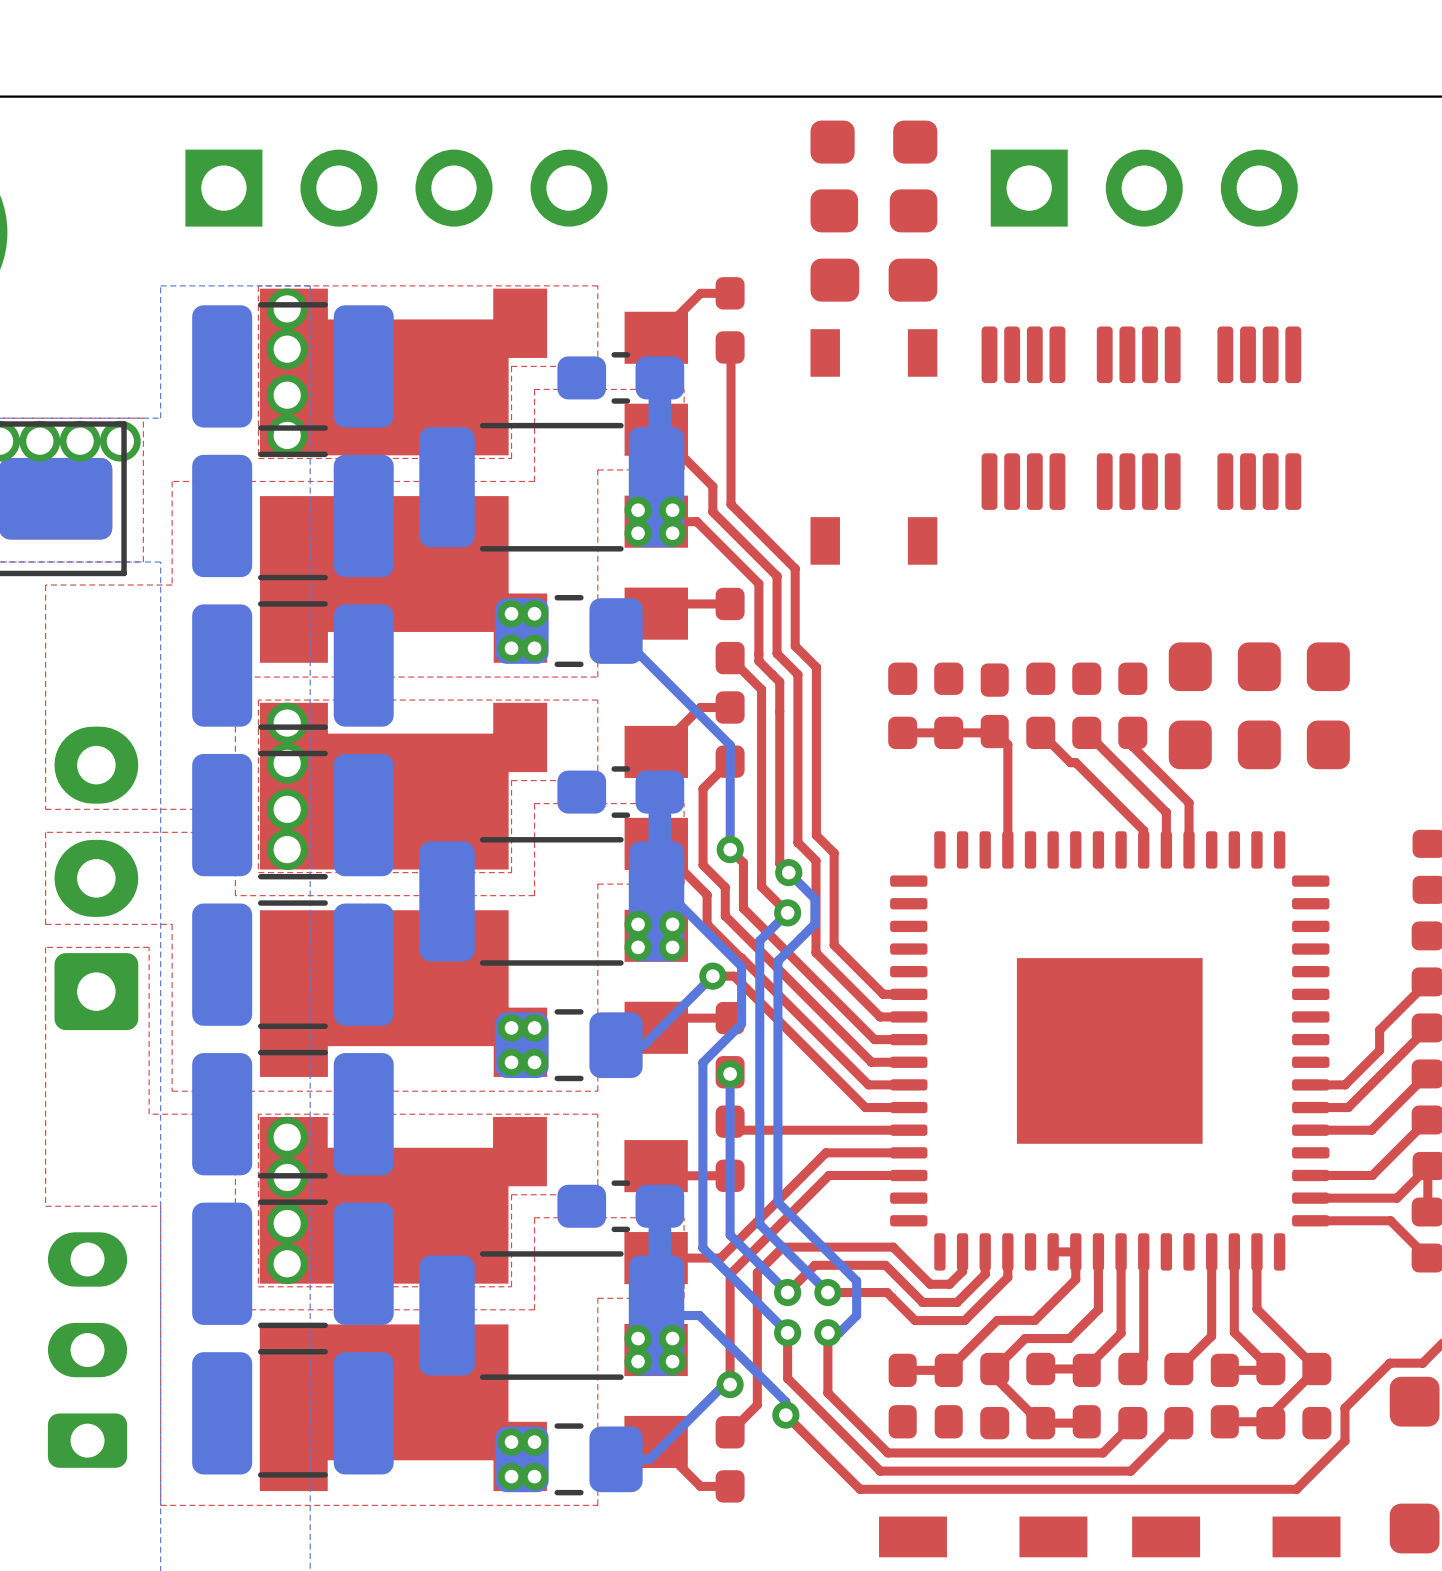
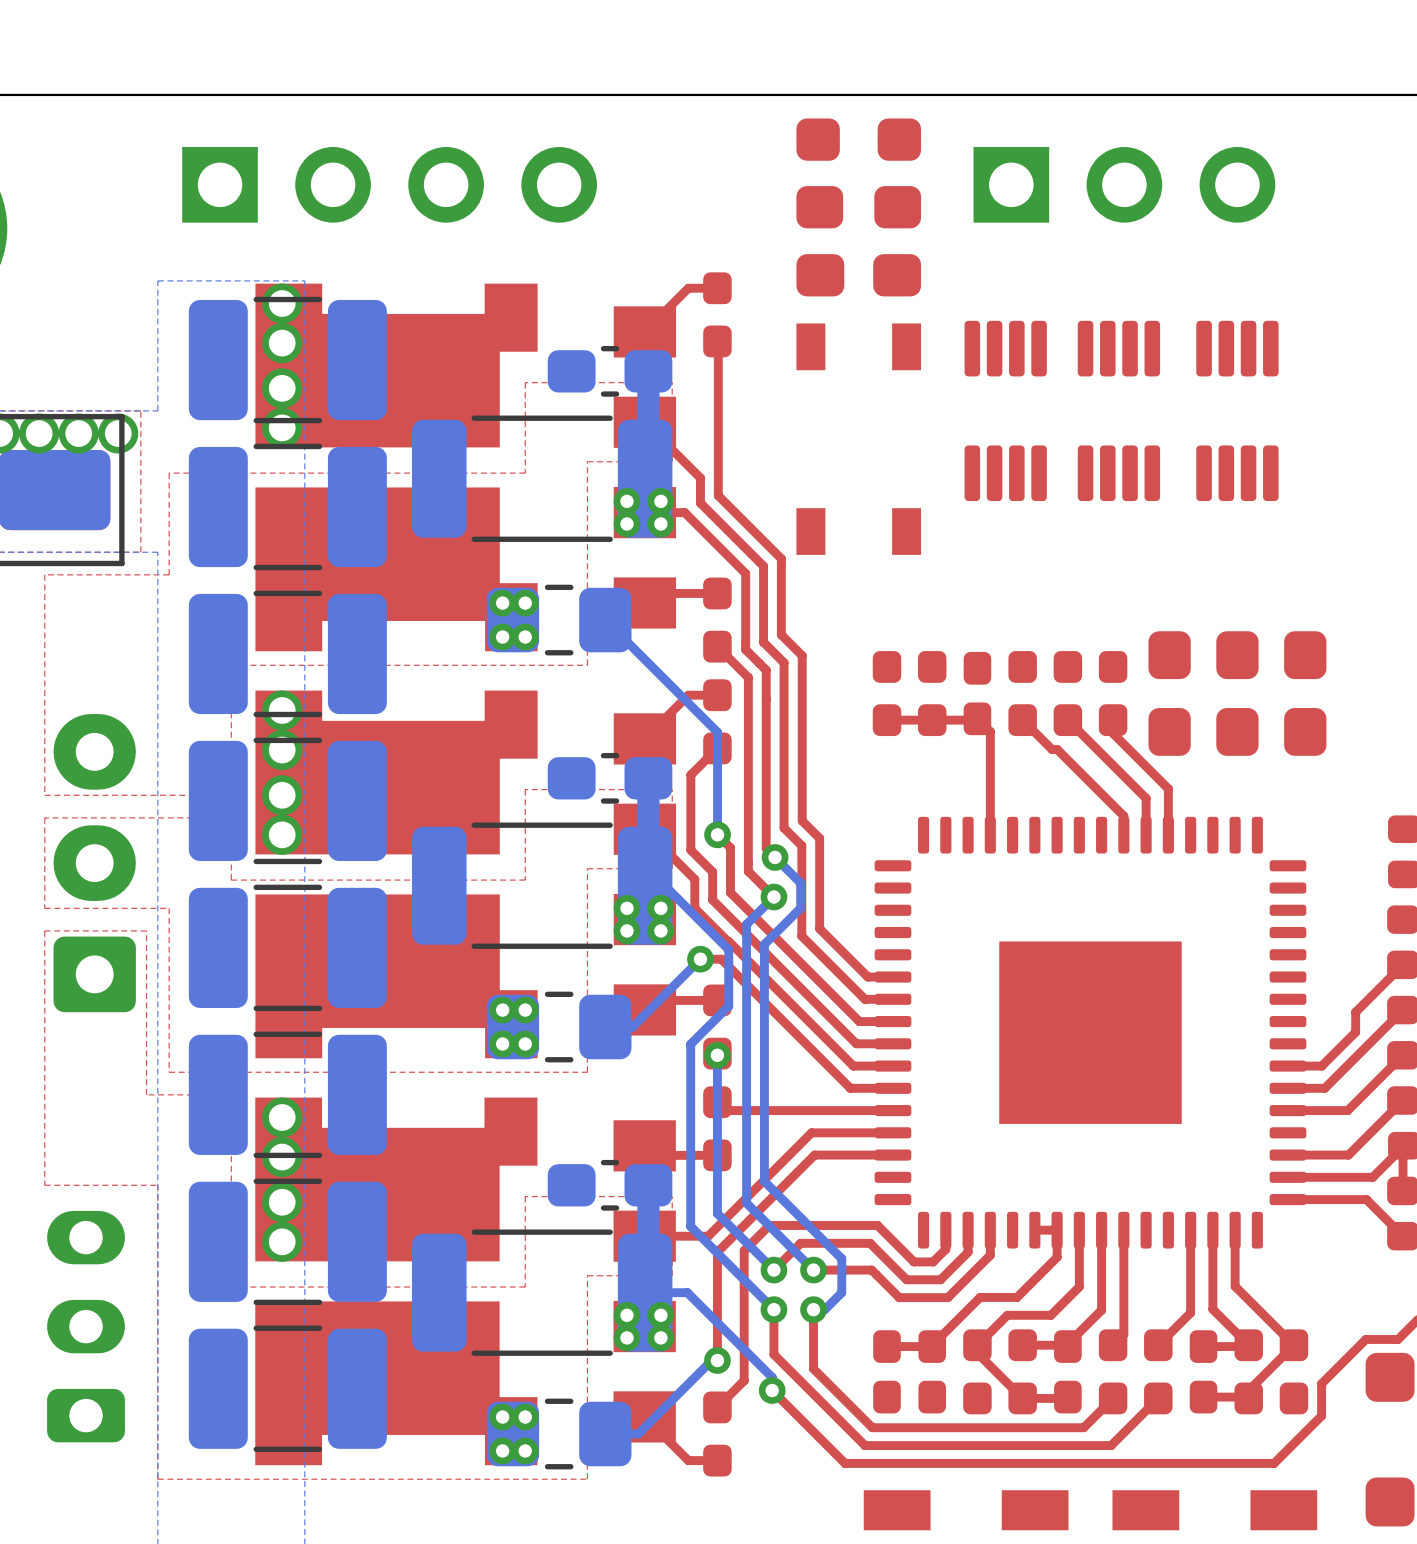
top zone outline: (597, 285) (597, 366) (511, 366) (511, 458) (258, 458) (258, 285) (597, 285) -> none
top zone outline: (597, 700) (597, 780) (511, 780) (511, 872) (258, 872) (258, 700) (597, 700) -> none
top zone outline: (597, 1114) (597, 1194) (511, 1194) (511, 1286) (258, 1286) (258, 1114) (597, 1114) -> none

